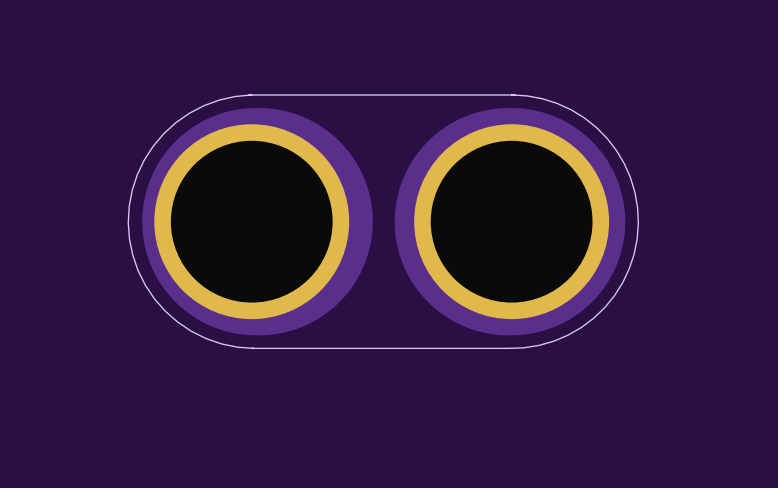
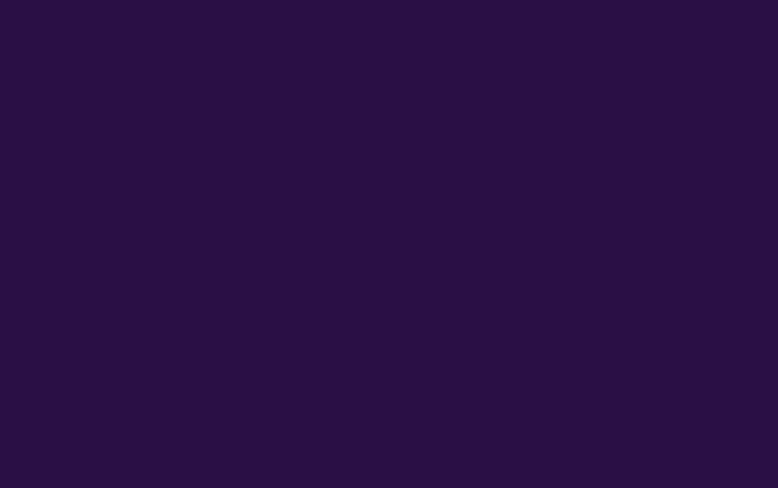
part: (383, 221) -> none

